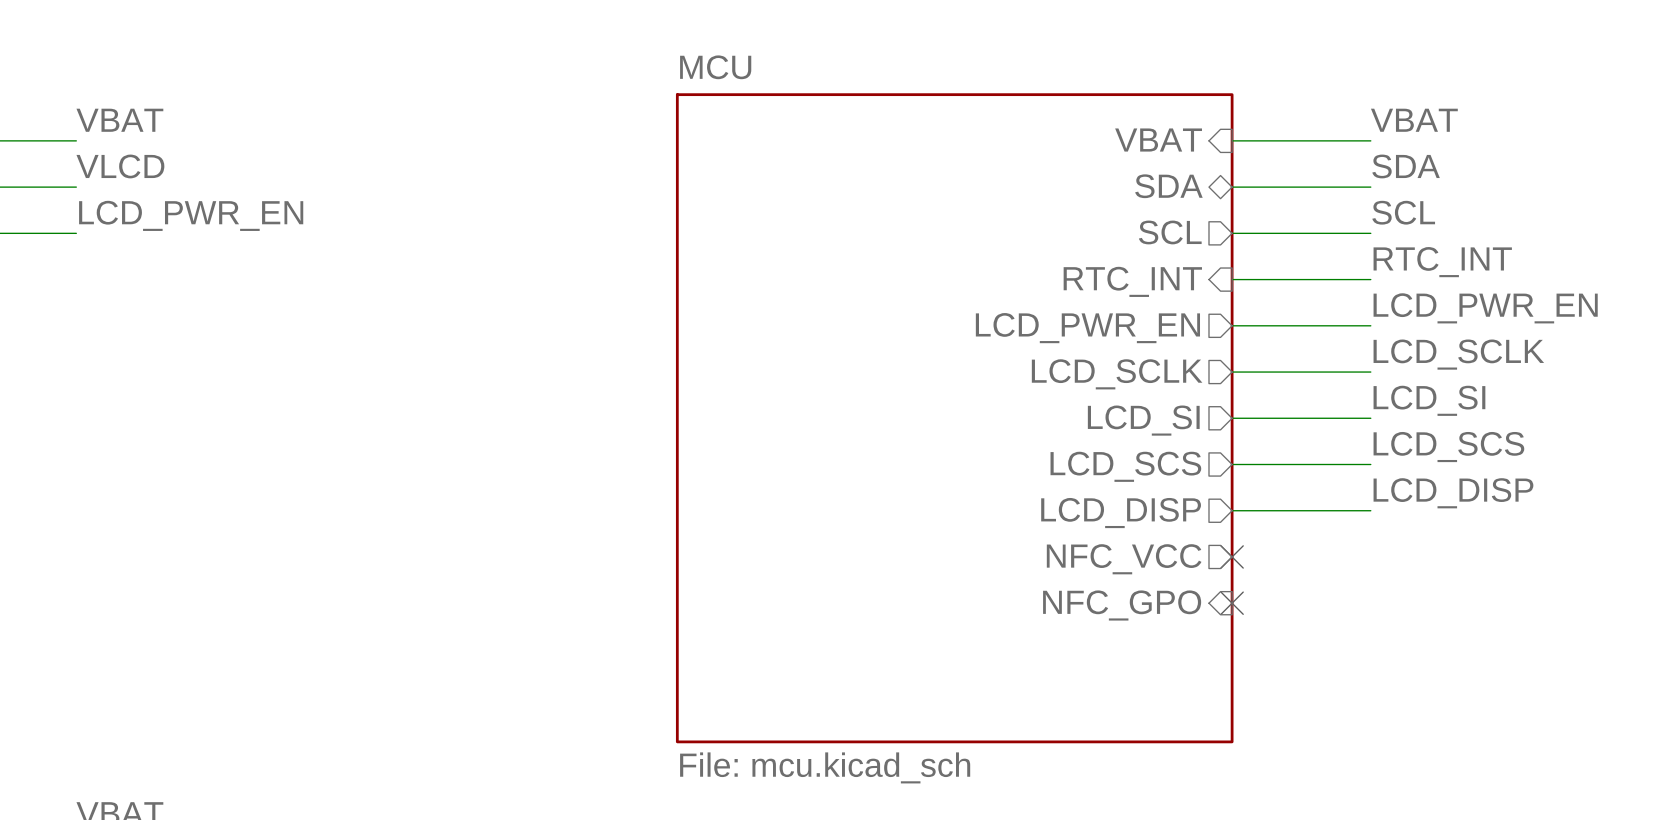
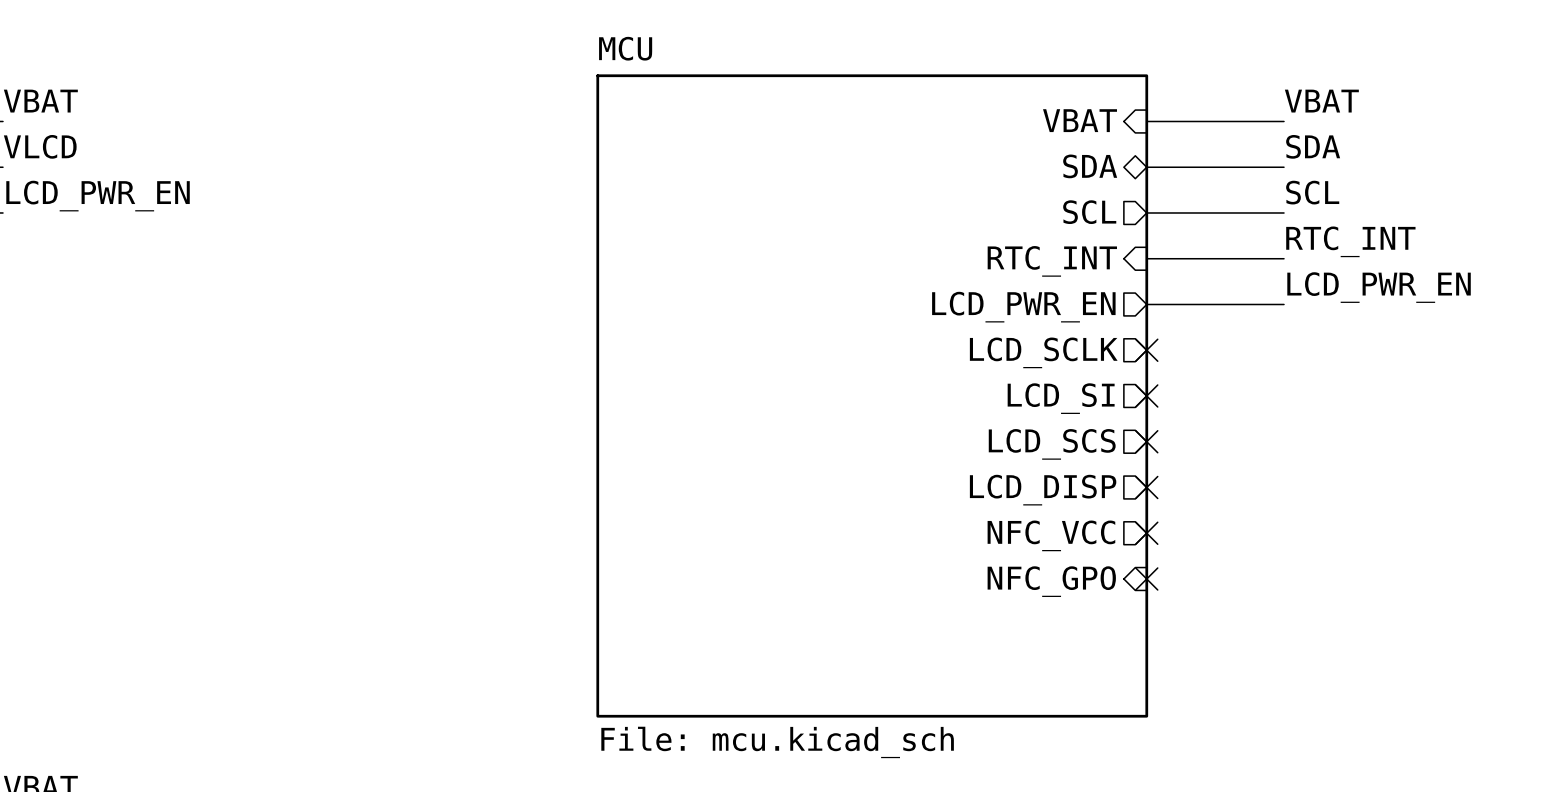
label: LCD_SCLK (1458, 354) -> none
wire: (1232, 372) (1370, 372) -> none
no-connect mark: none -> (1146, 350)
label: LCD_SI (1429, 400) -> none
wire: (1232, 418) (1370, 418) -> none
no-connect mark: none -> (1146, 395)
label: LCD_SCS (1448, 447) -> none
wire: (1232, 464) (1370, 464) -> none
no-connect mark: none -> (1146, 441)
label: LCD_DISP (1453, 493) -> none
wire: (1232, 510) (1370, 510) -> none
no-connect mark: none -> (1146, 487)

